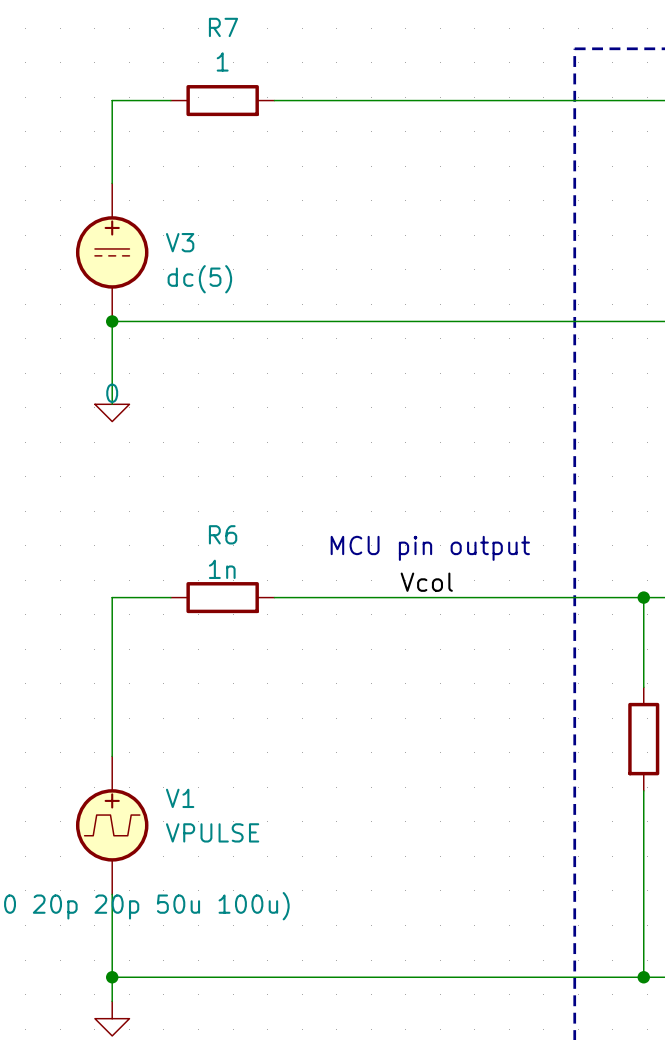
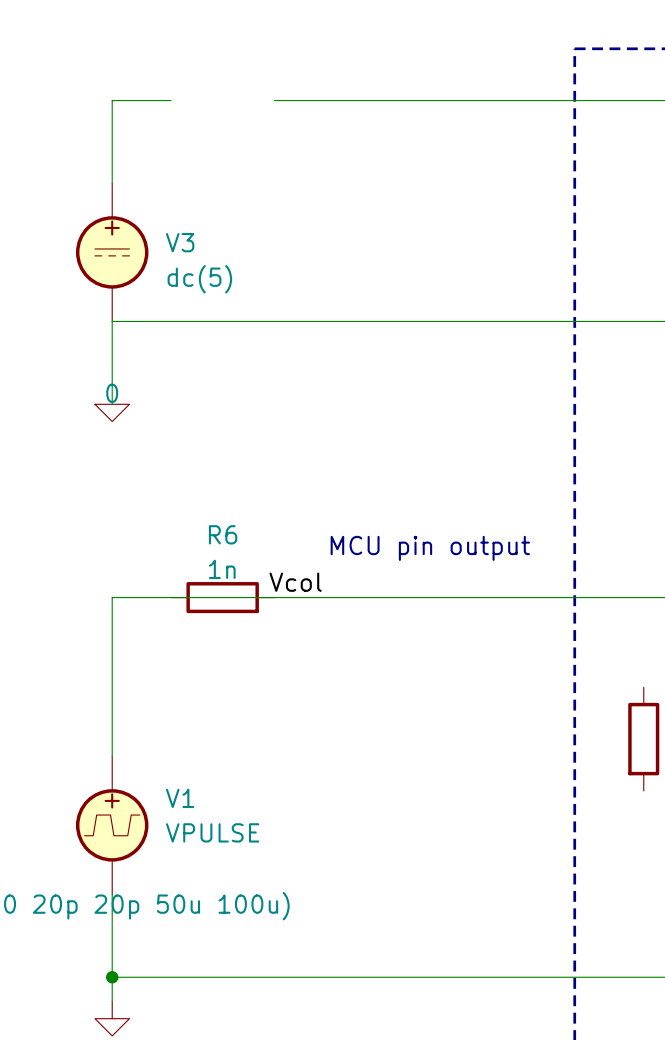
R7: 1 (222, 100) -> none
junction: (112, 321) -> none
label position: Vcol (426, 582) -> Vcol (295, 582)
wire: none -> (170, 597) (274, 597)
wire: (643, 597) (643, 687) -> none
junction: (643, 597) -> none
wire: (643, 790) (643, 977) -> none
junction: (643, 977) -> none

